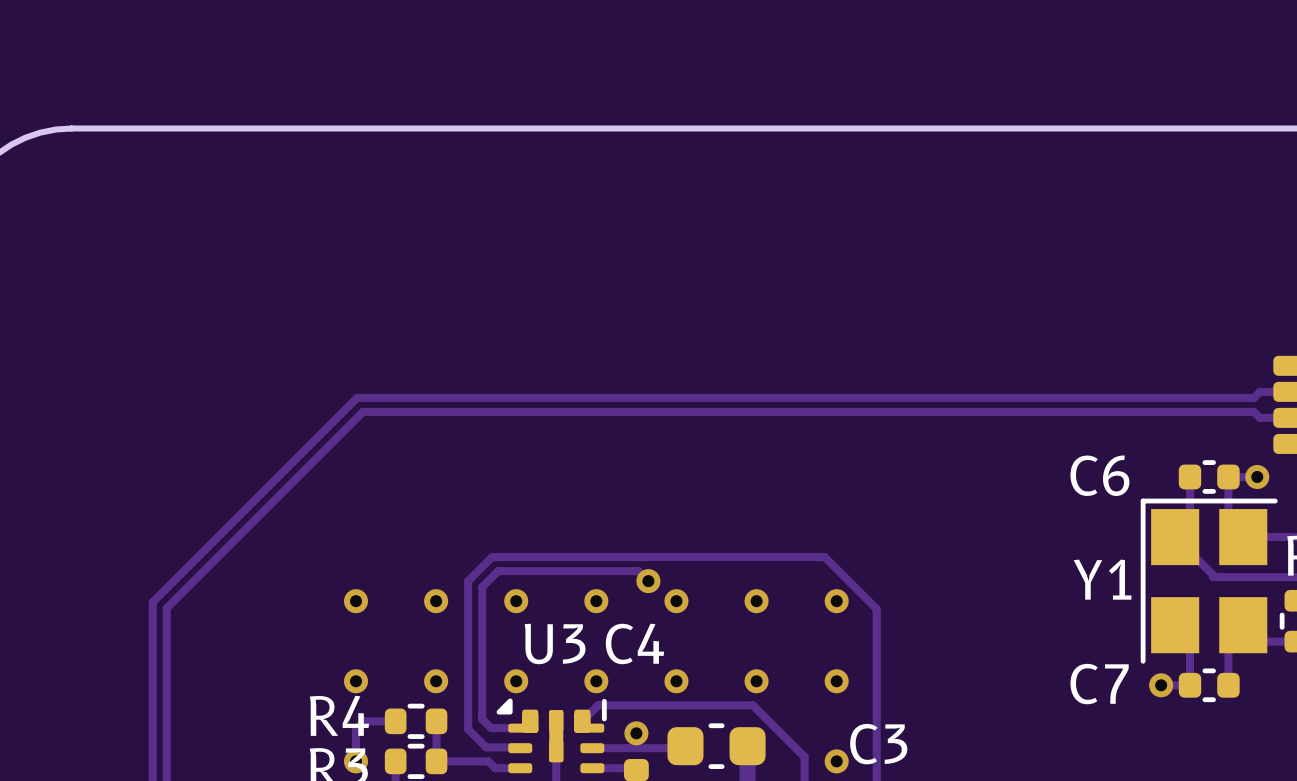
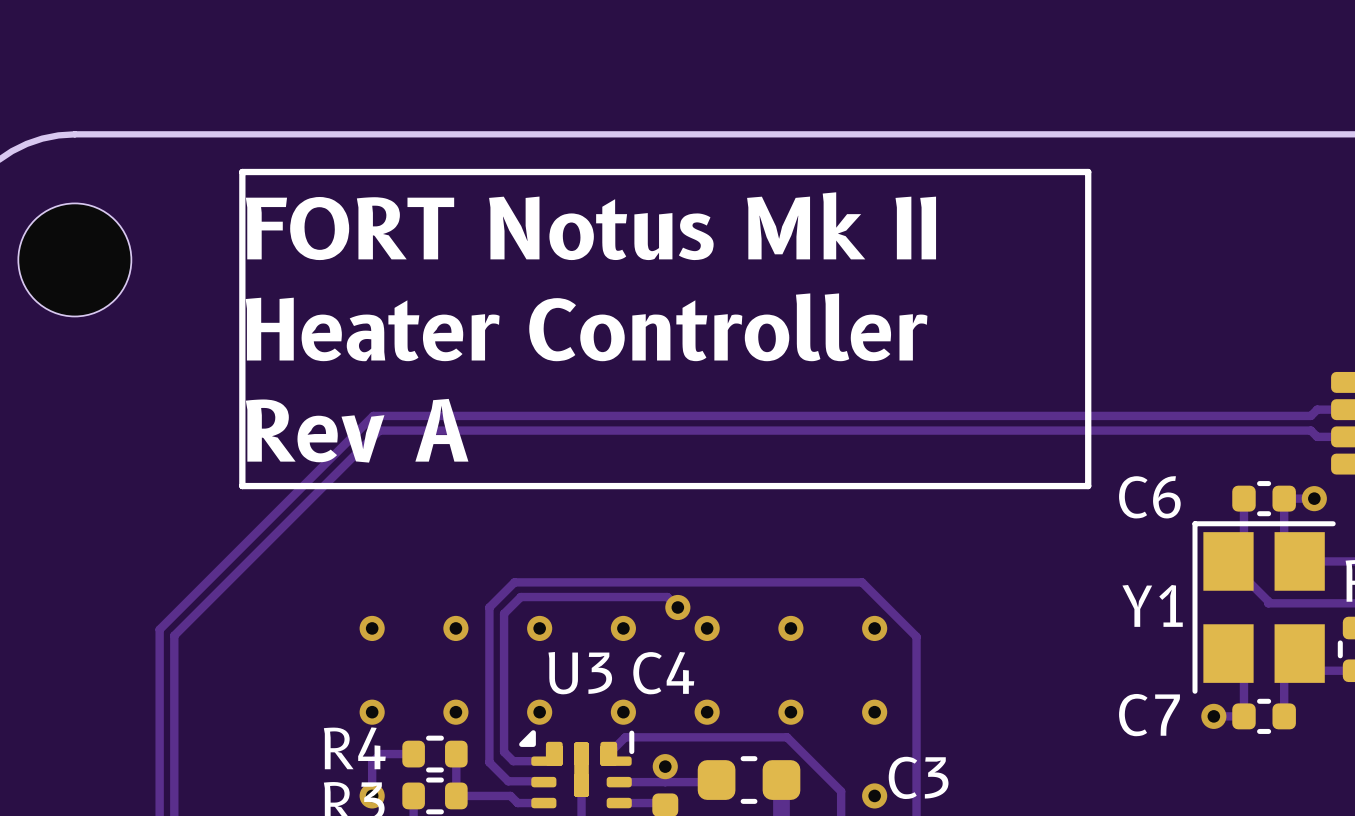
line: none -> (242, 172) (1088, 172) (1088, 486) (242, 486) (242, 172)
text: none -> FORT Notus Mk II (590, 226)
part: none -> (74, 259)
text: none -> Heater Controller (586, 327)
text: none -> Rev A (357, 430)

